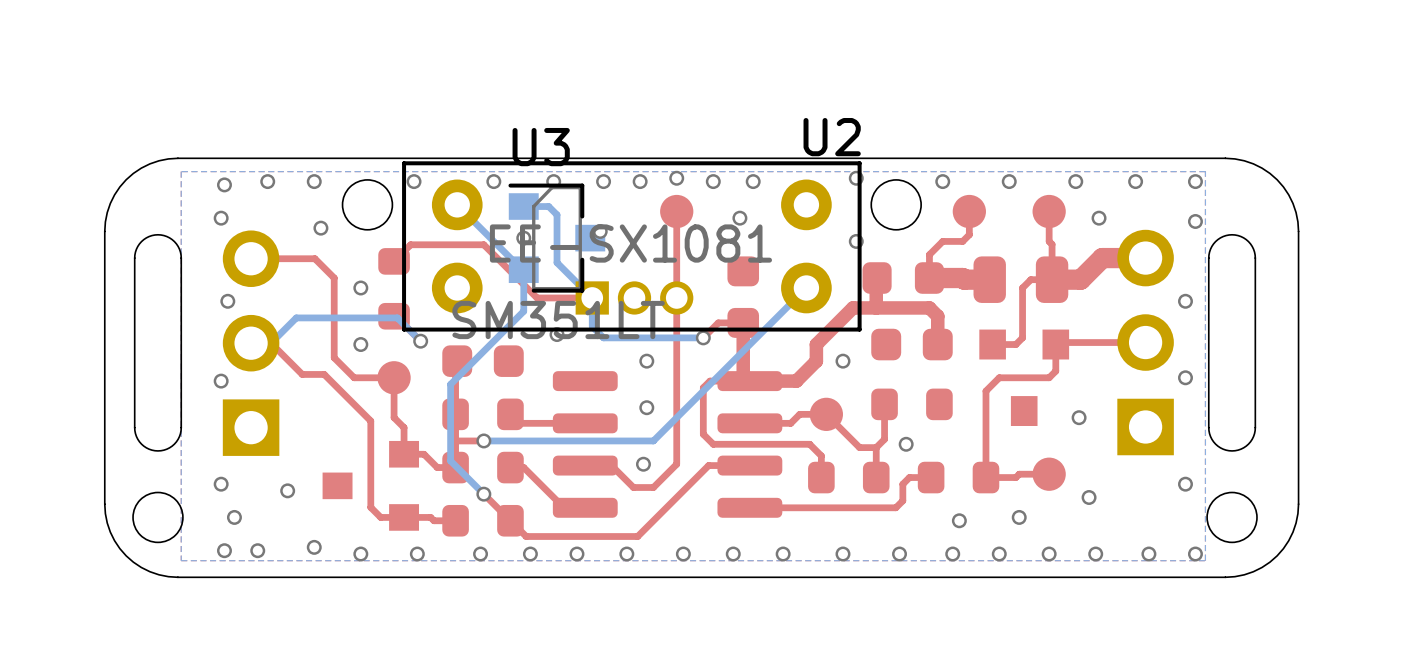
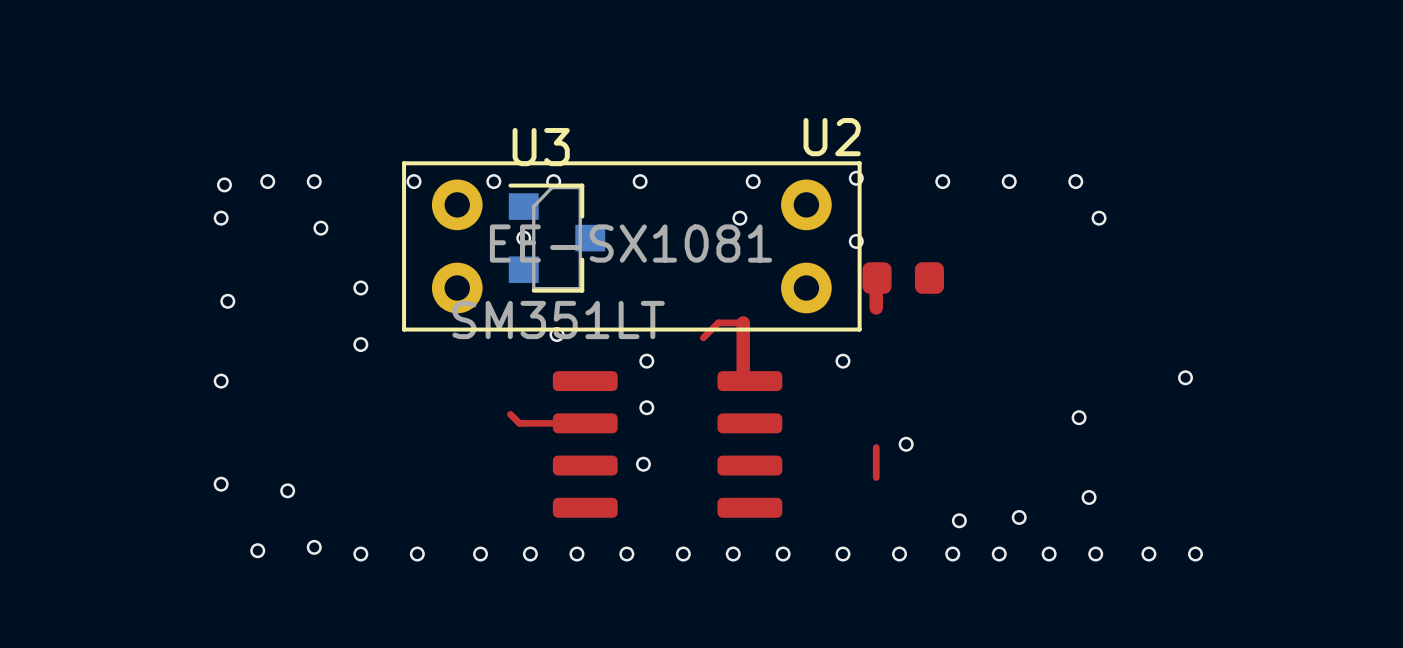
board edge: (1225, 158) (177, 158) (158, 160) (141, 168) (126, 179) (110, 203) (105, 221) (104, 504) (107, 523) (119, 548) (133, 562) (149, 571) (177, 577) (1225, 577) (1244, 574) (1261, 567) (1277, 555) (1288, 540) (1297, 513) (1298, 231) (1292, 203) (1277, 179) (1253, 163) (1225, 158) -> none
bottom zone outline: (1205, 171) (1205, 560) (181, 560) (181, 171) (1205, 171) -> none
via: (676, 178) -> none
round board edge: [341, 179, 394, 231] -> none
round board edge: [870, 179, 922, 231] -> none
via: (603, 181) -> none
via: (713, 181) -> none
via: (1135, 181) -> none
via: (1195, 181) -> none
bottom track: (457, 204) (523, 269) (523, 311) (450, 384) (450, 460) (483, 494) -> none
bottom track: (523, 206) (548, 206) (557, 214) (557, 262) (592, 297) (592, 326) (603, 337) (703, 337) -> none
top track: (676, 208) (676, 464) (653, 487) (633, 487) (611, 465) (585, 465) -> none
part: (676, 211) -> none
top track: (969, 211) (969, 234) (962, 241) (942, 241) (929, 254) (929, 278) (989, 279) -> none
part: (969, 211) -> none
top track: (1049, 211) (1049, 241) (1052, 244) (1052, 279) -> none
part: (1049, 211) -> none
via: (1195, 221) -> none
via: (600, 231) -> none
board edge: (181, 258) (181, 430) (178, 439) (172, 446) (164, 450) (154, 450) (141, 444) (134, 430) (134, 255) (137, 246) (143, 239) (151, 235) (161, 234) (169, 237) (176, 243) (181, 258) -> none
top track: (271, 258) (314, 258) (334, 278) (334, 357) (354, 377) (394, 377) (394, 417) (404, 427) (404, 454) (424, 454) (437, 467) (455, 467) (455, 362) (457, 361) -> none
top track: (1145, 258) (1102, 258) (1080, 279) (1052, 279) -> none
board edge: (1255, 258) (1255, 430) (1252, 439) (1246, 446) (1238, 450) (1229, 450) (1215, 444) (1208, 430) (1208, 255) (1211, 246) (1217, 239) (1226, 235) (1235, 234) (1243, 237) (1250, 243) (1255, 258) -> none
top track: (394, 261) (410, 244) (483, 244) (537, 297) (592, 297) -> none
part: (1020, 279) -> none
top track: (1052, 279) (1030, 279) (1022, 287) (1022, 337) (1015, 344) (992, 344) -> none
bottom track: (806, 287) (653, 440) (483, 440) -> none
part: (394, 288) -> none
part: (634, 297) -> none
part: (743, 297) -> none
via: (1185, 301) -> none
via: (703, 337) -> none
bottom track: (420, 341) (397, 317) (296, 317) (271, 343) -> none
via: (420, 341) -> none
top track: (1145, 342) (1057, 342) (1055, 344) (1055, 371) (1049, 377) (999, 377) (985, 391) (985, 477) (1015, 477) (1019, 474) (1049, 474) -> none
part: (1145, 342) -> none
part: (251, 343) -> none
top track: (271, 343) (302, 374) (324, 374) (370, 421) (370, 507) (380, 517) (430, 517) (433, 520) (455, 520) -> none
part: (911, 344) -> none
top track: (937, 344) (937, 316) (929, 307) (852, 307) (816, 344) (816, 361) (796, 381) (709, 381) (703, 387) (703, 434) (713, 444) (809, 444) (821, 455) (821, 477) -> none
part: (483, 361) -> none
part: (394, 377) -> none
part: (1024, 377) -> none
top track: (884, 404) (884, 439) (876, 447) (859, 447) (826, 414) (799, 414) (790, 423) (749, 423) -> none
part: (911, 404) -> none
part: (483, 414) -> none
part: (826, 414) -> none
top track: (483, 440) (457, 440) (455, 442) -> none
via: (483, 440) -> none
top track: (749, 465) (708, 465) (637, 536) (526, 536) (483, 494) -> none
part: (483, 467) -> none
top track: (510, 467) (523, 467) (563, 507) (585, 507) -> none
part: (1049, 474) -> none
part: (848, 477) -> none
top track: (931, 477) (909, 477) (902, 484) (902, 500) (895, 507) (749, 507) -> none
part: (958, 477) -> none
via: (1185, 484) -> none
part: (370, 485) -> none
round board edge: [132, 491, 184, 544] -> none
round board edge: [1206, 491, 1258, 544] -> none
via: (483, 494) -> none
via: (234, 517) -> none
part: (483, 520) -> none
via: (224, 550) -> none

